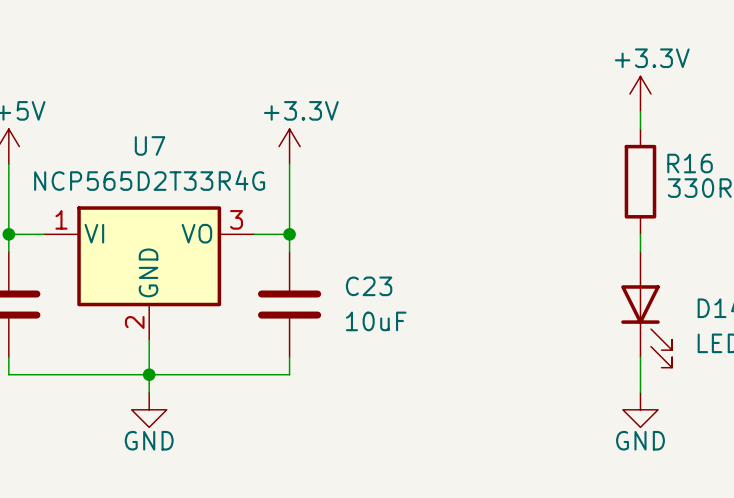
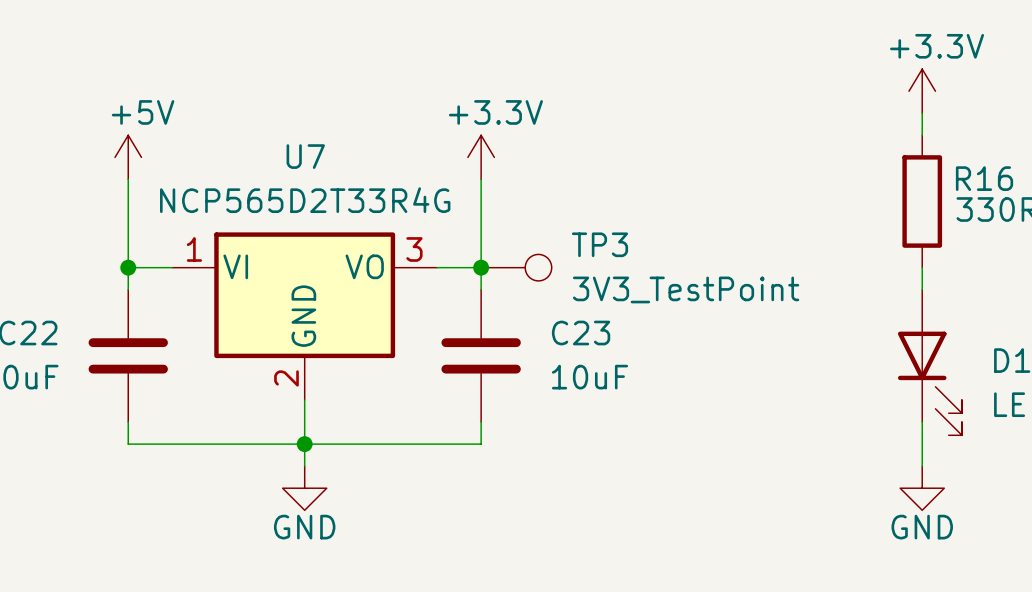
TP3: none -> 3V3_TestPoint (516, 267)

